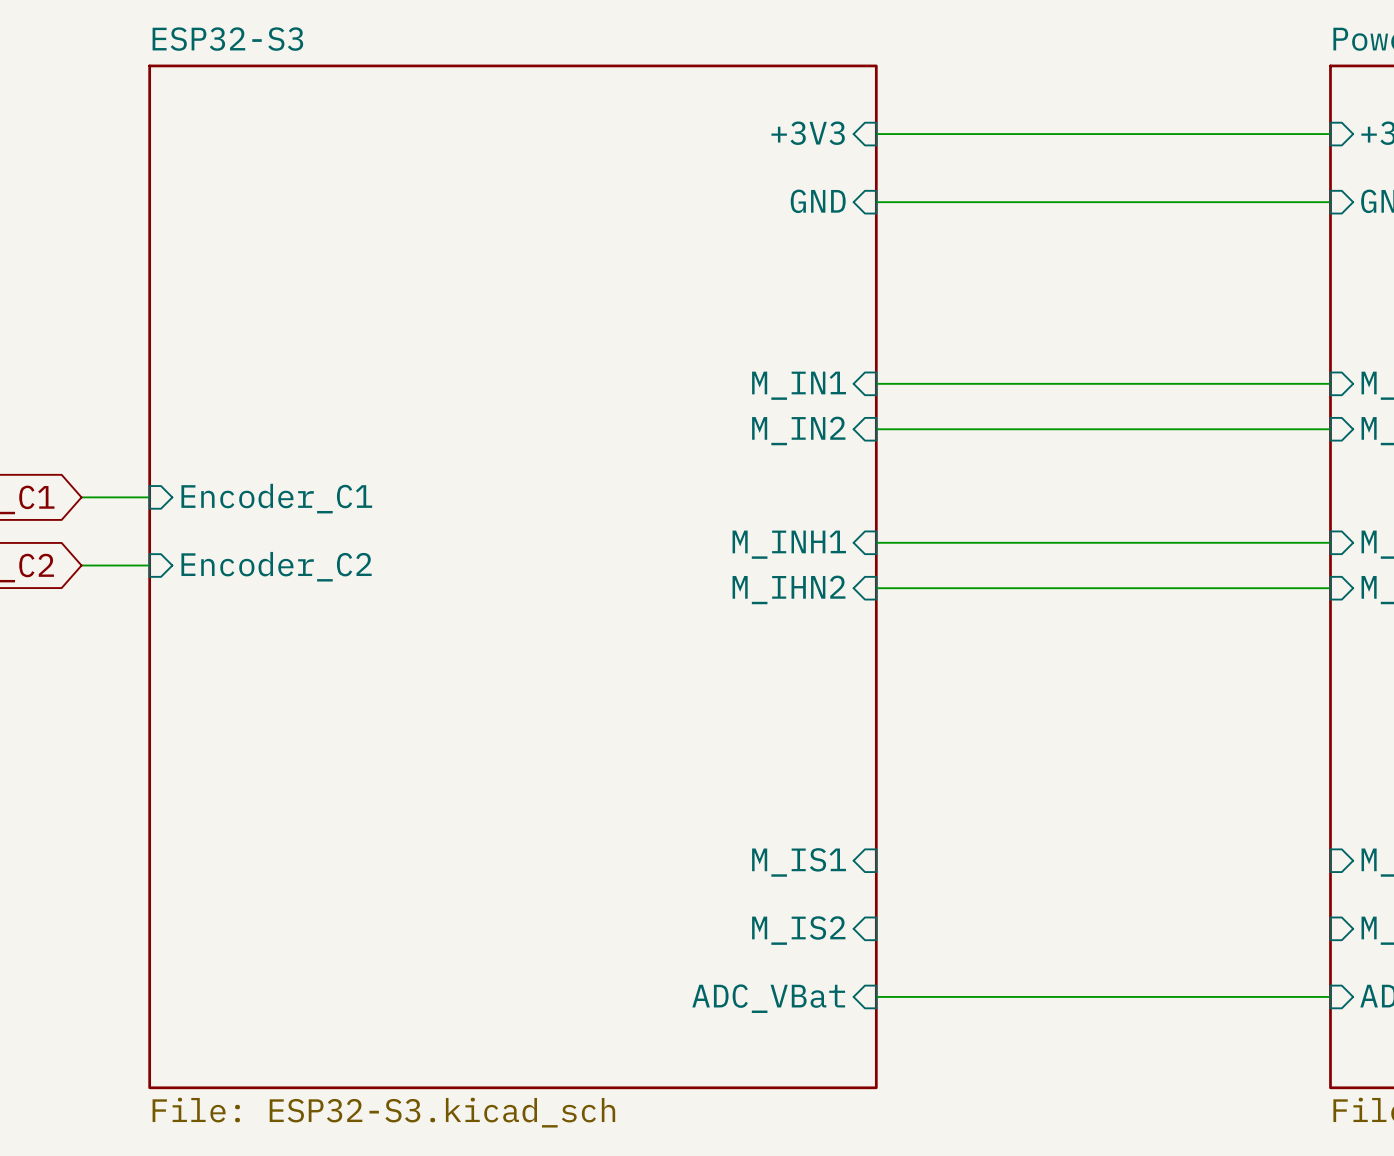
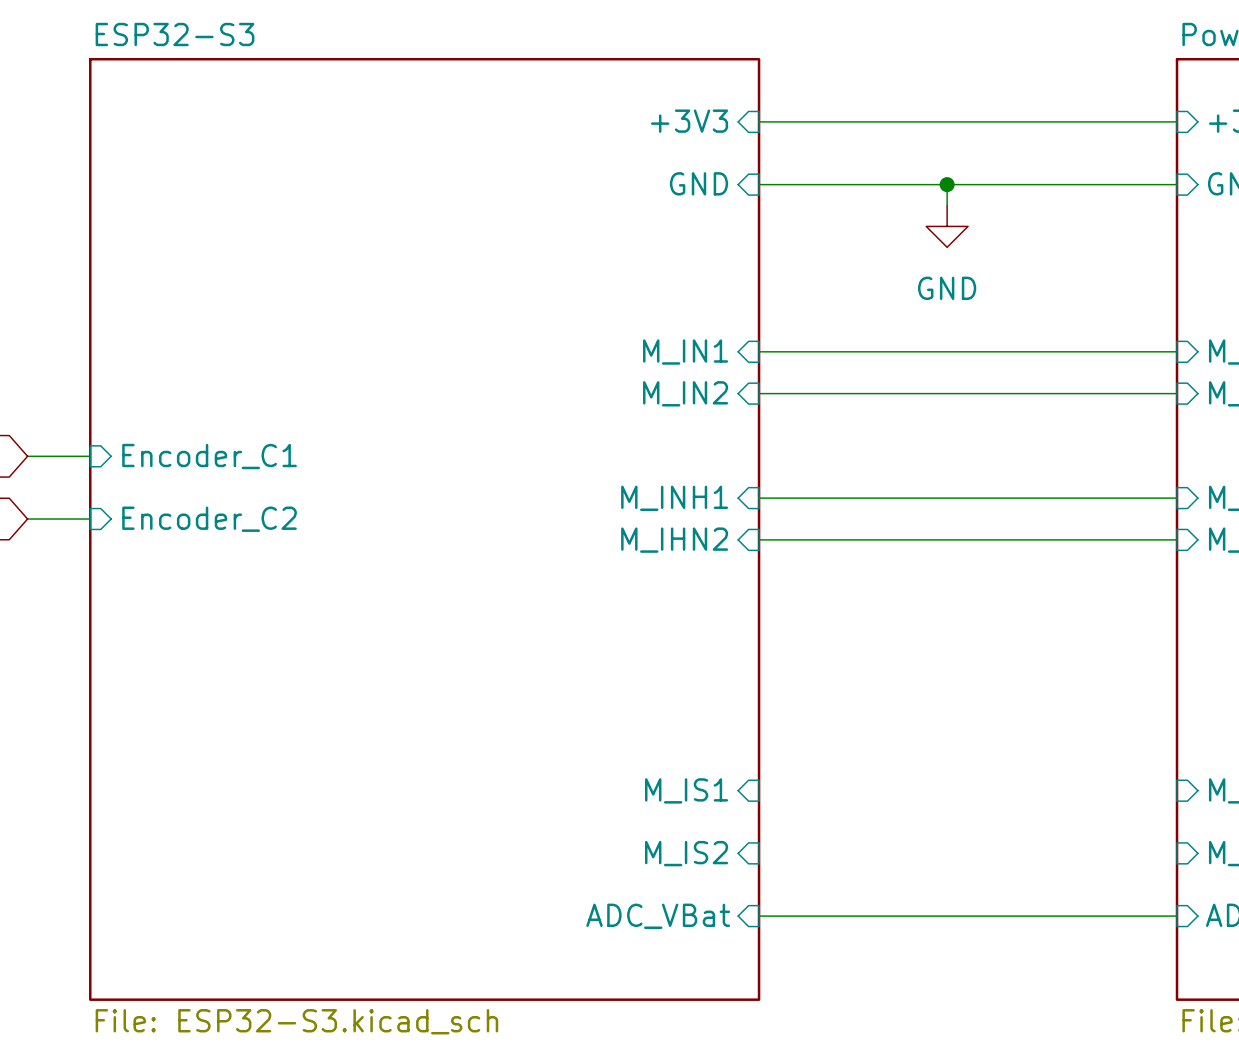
wire: none -> (947, 184) (947, 205)
junction: none -> (947, 184)
power symbol: none -> GND (947, 226)

